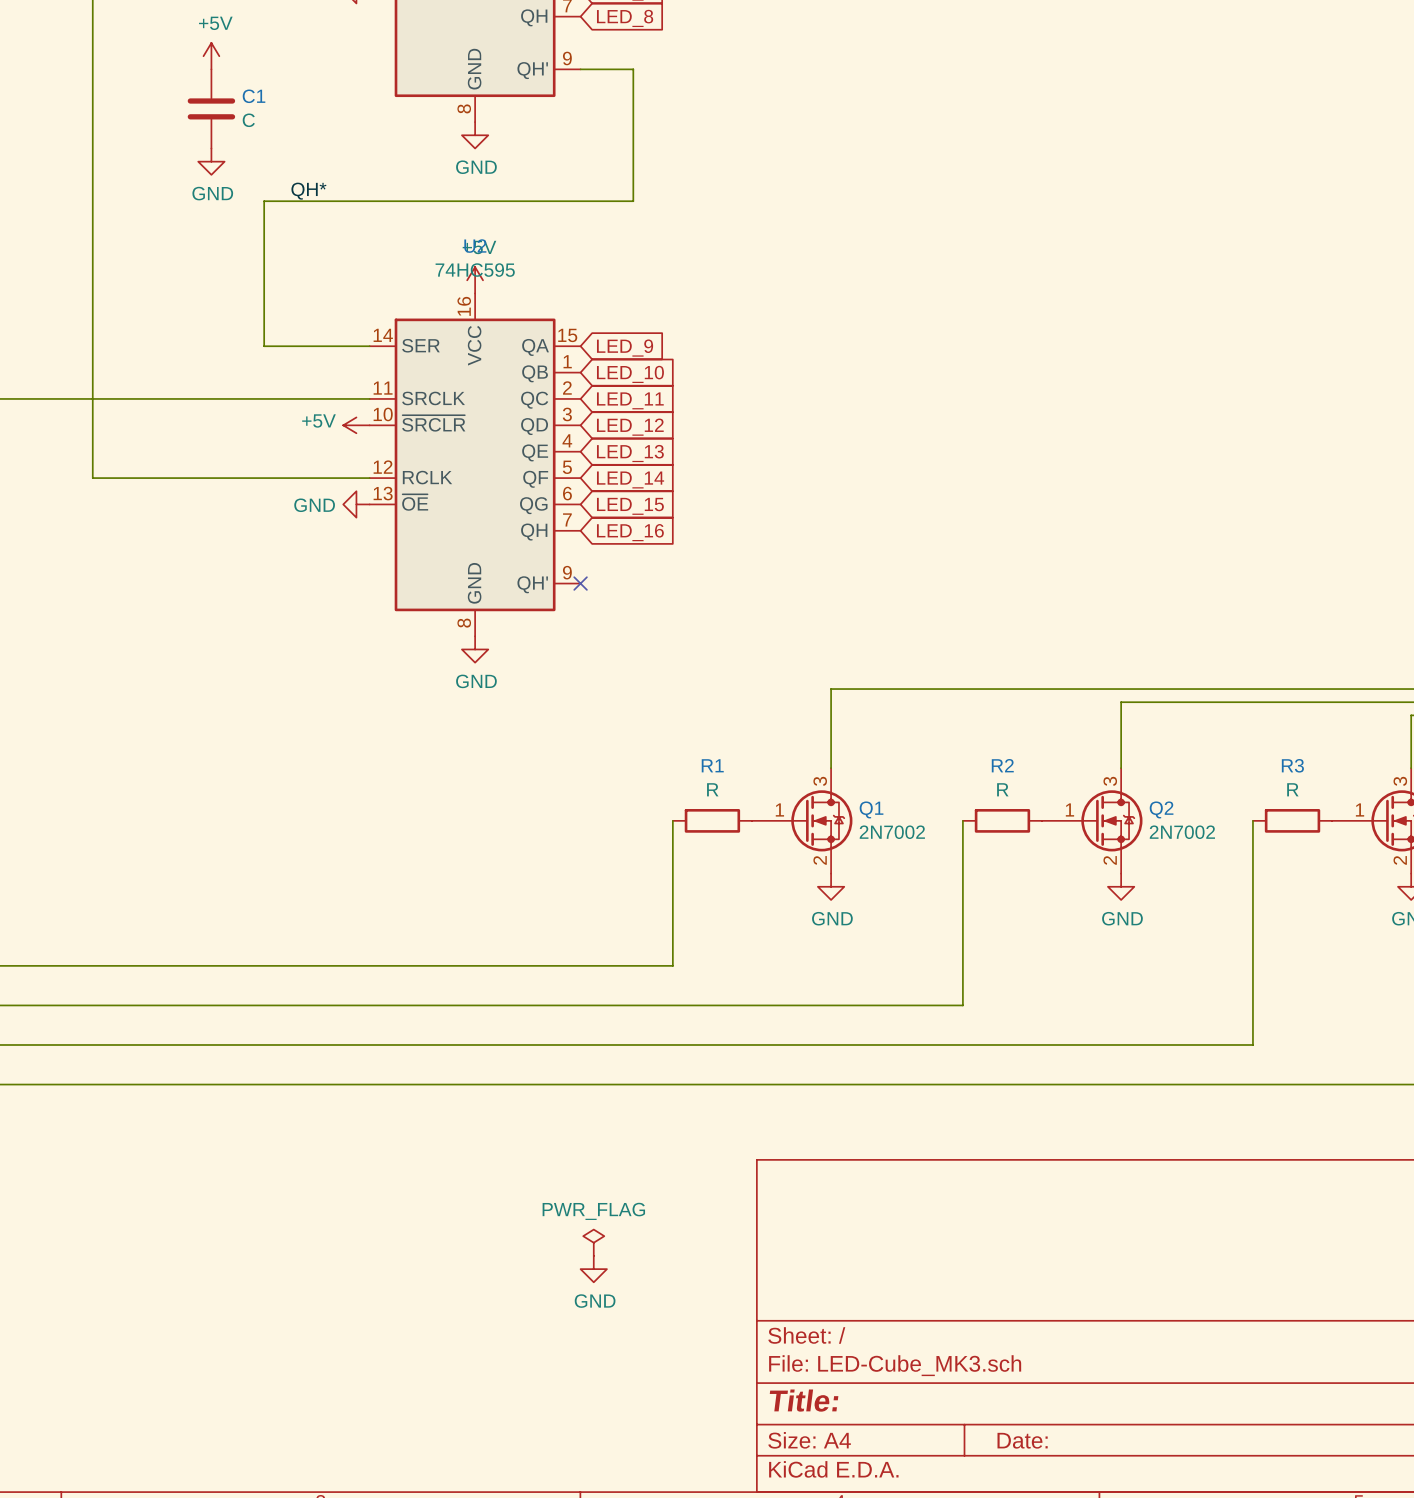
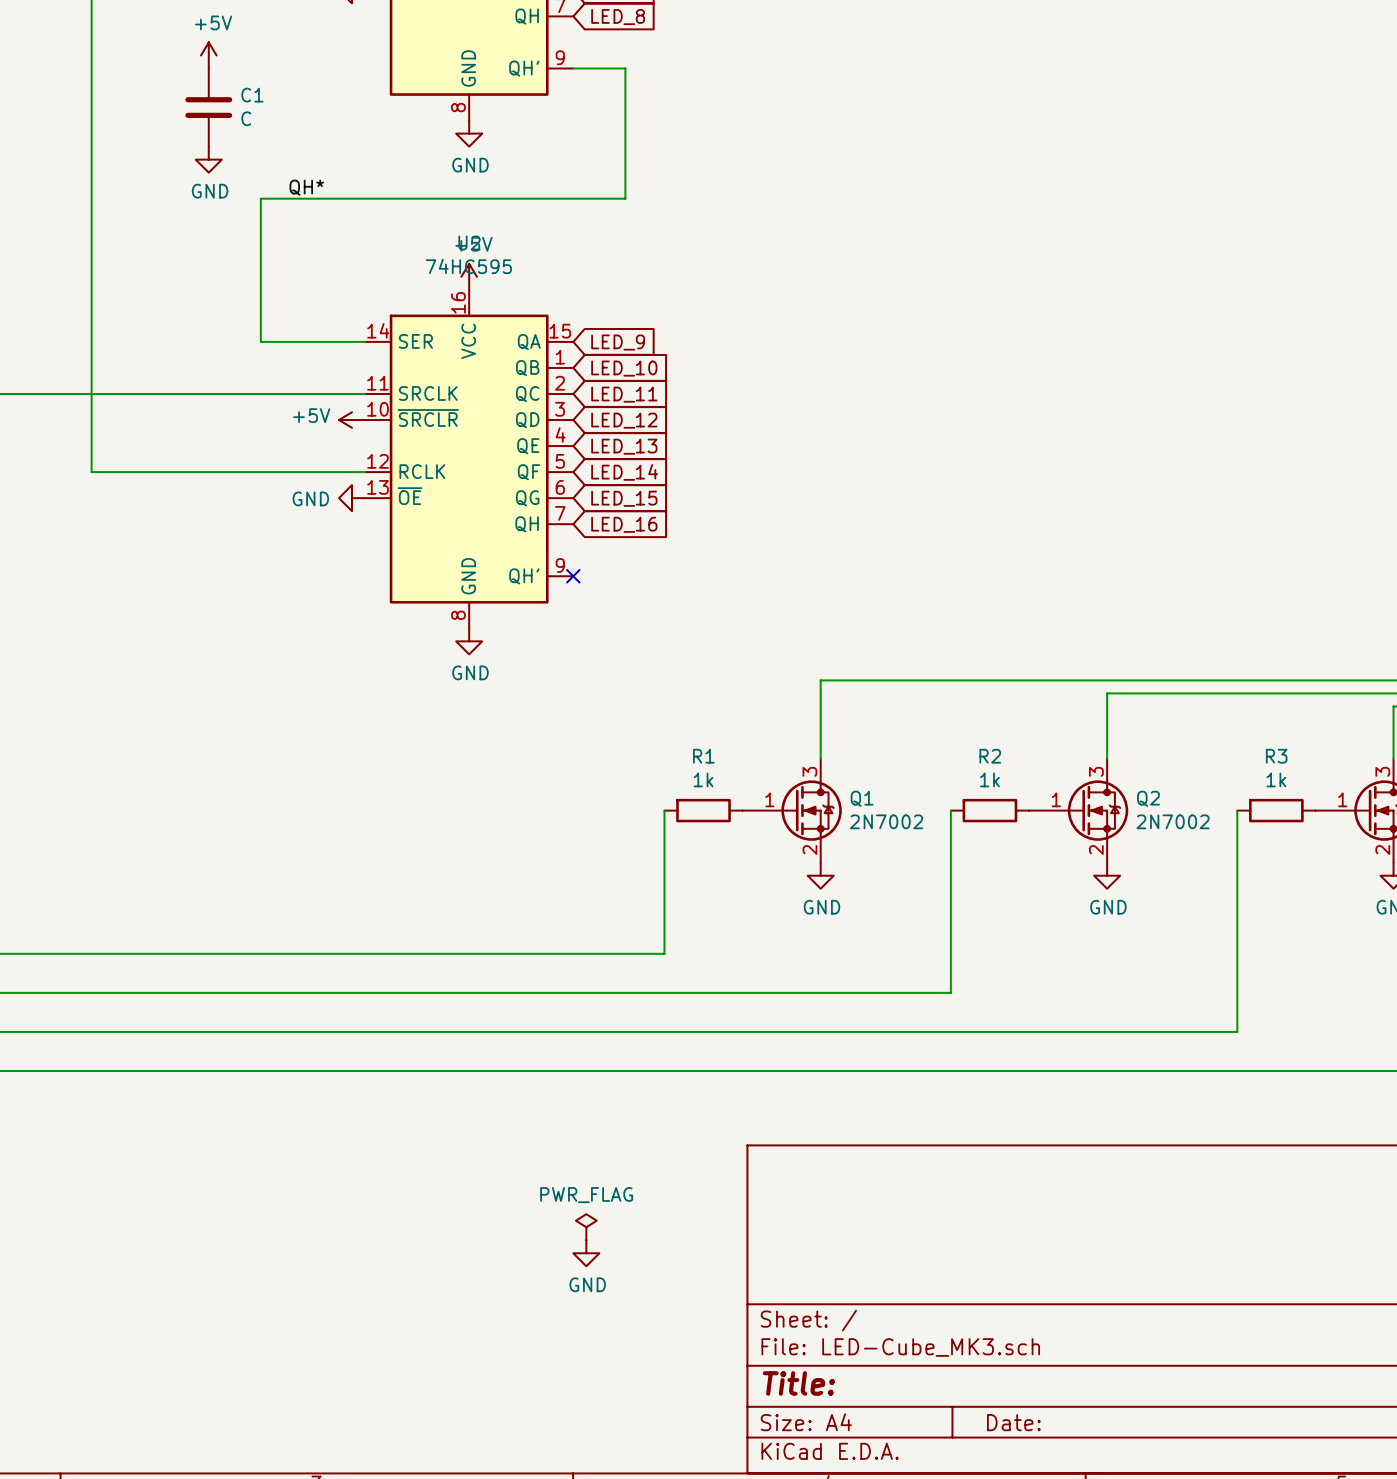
R1 value: R (712, 789) -> 1k (703, 779)
R2 value: R (1002, 789) -> 1k (989, 779)
R3 value: R (1292, 789) -> 1k (1276, 779)

